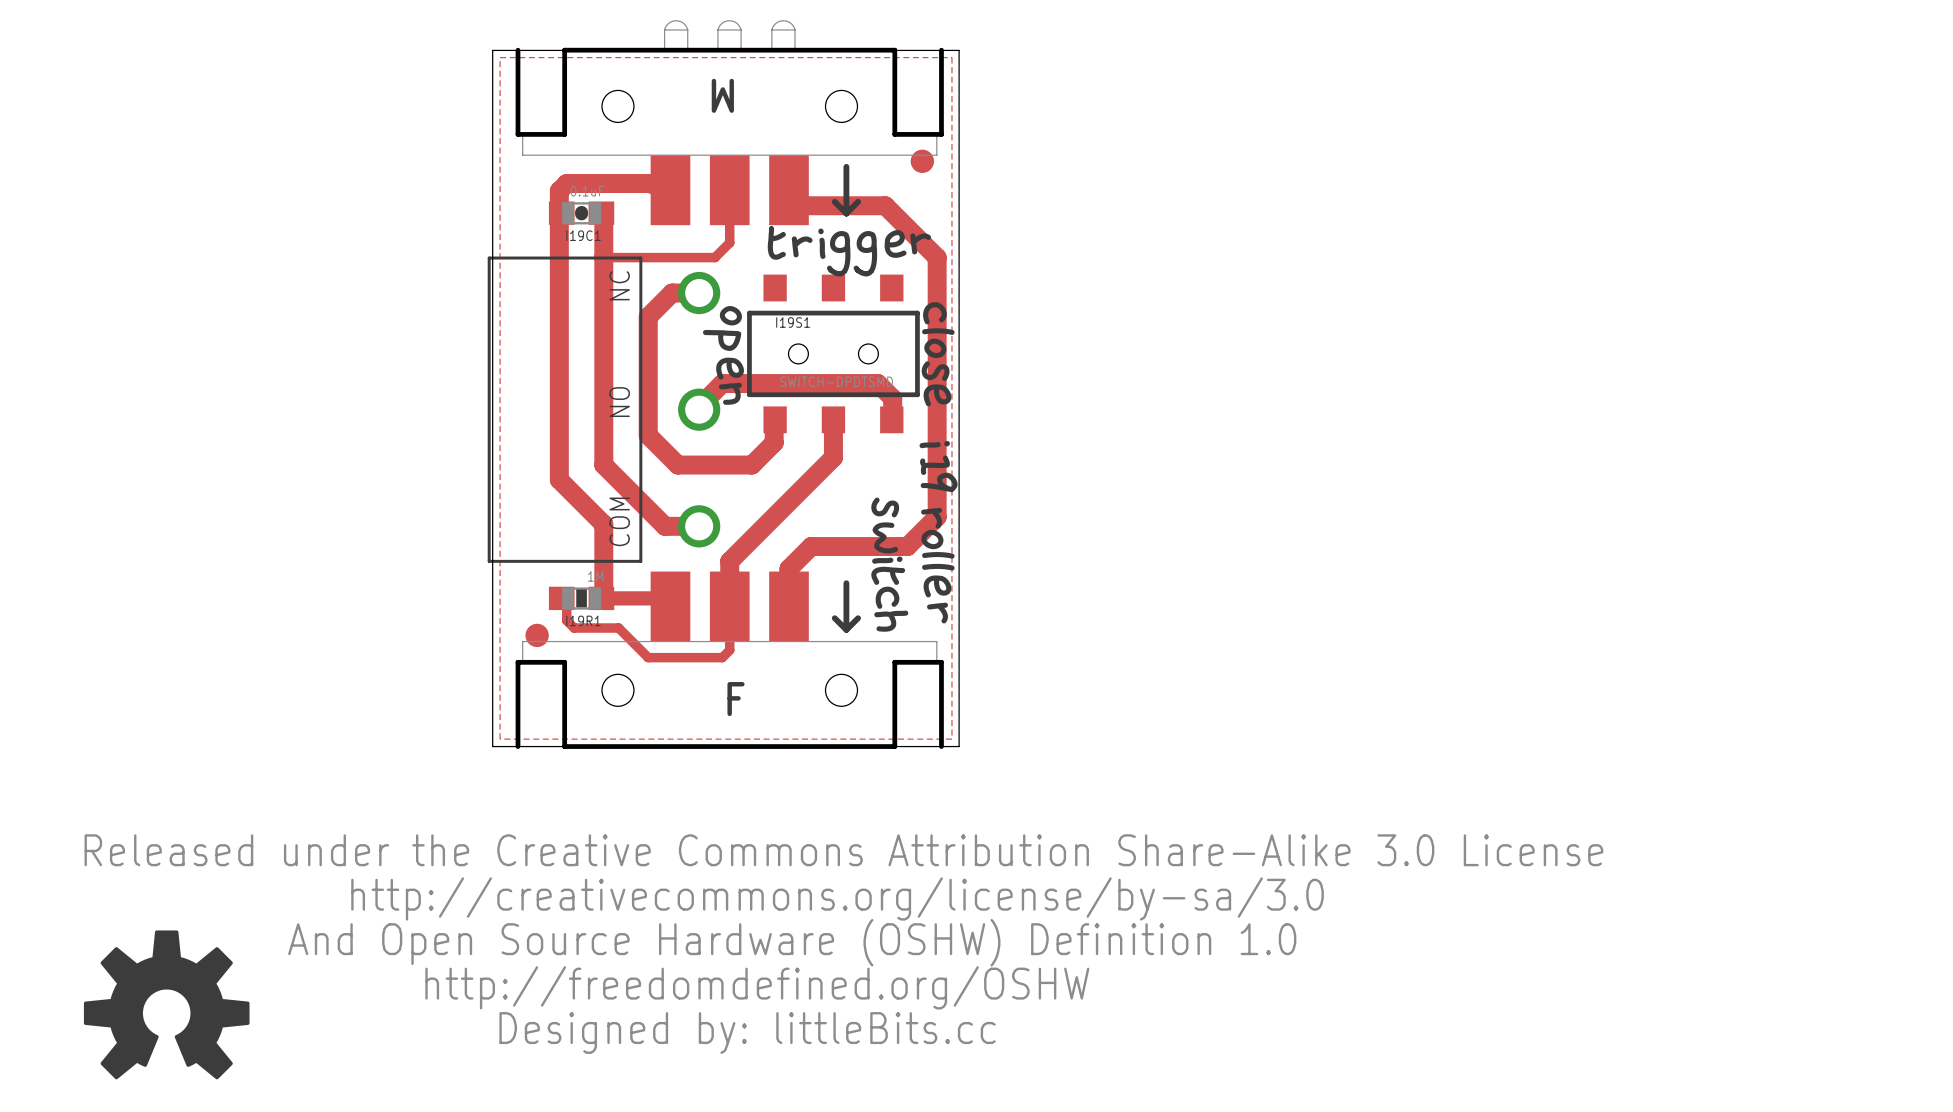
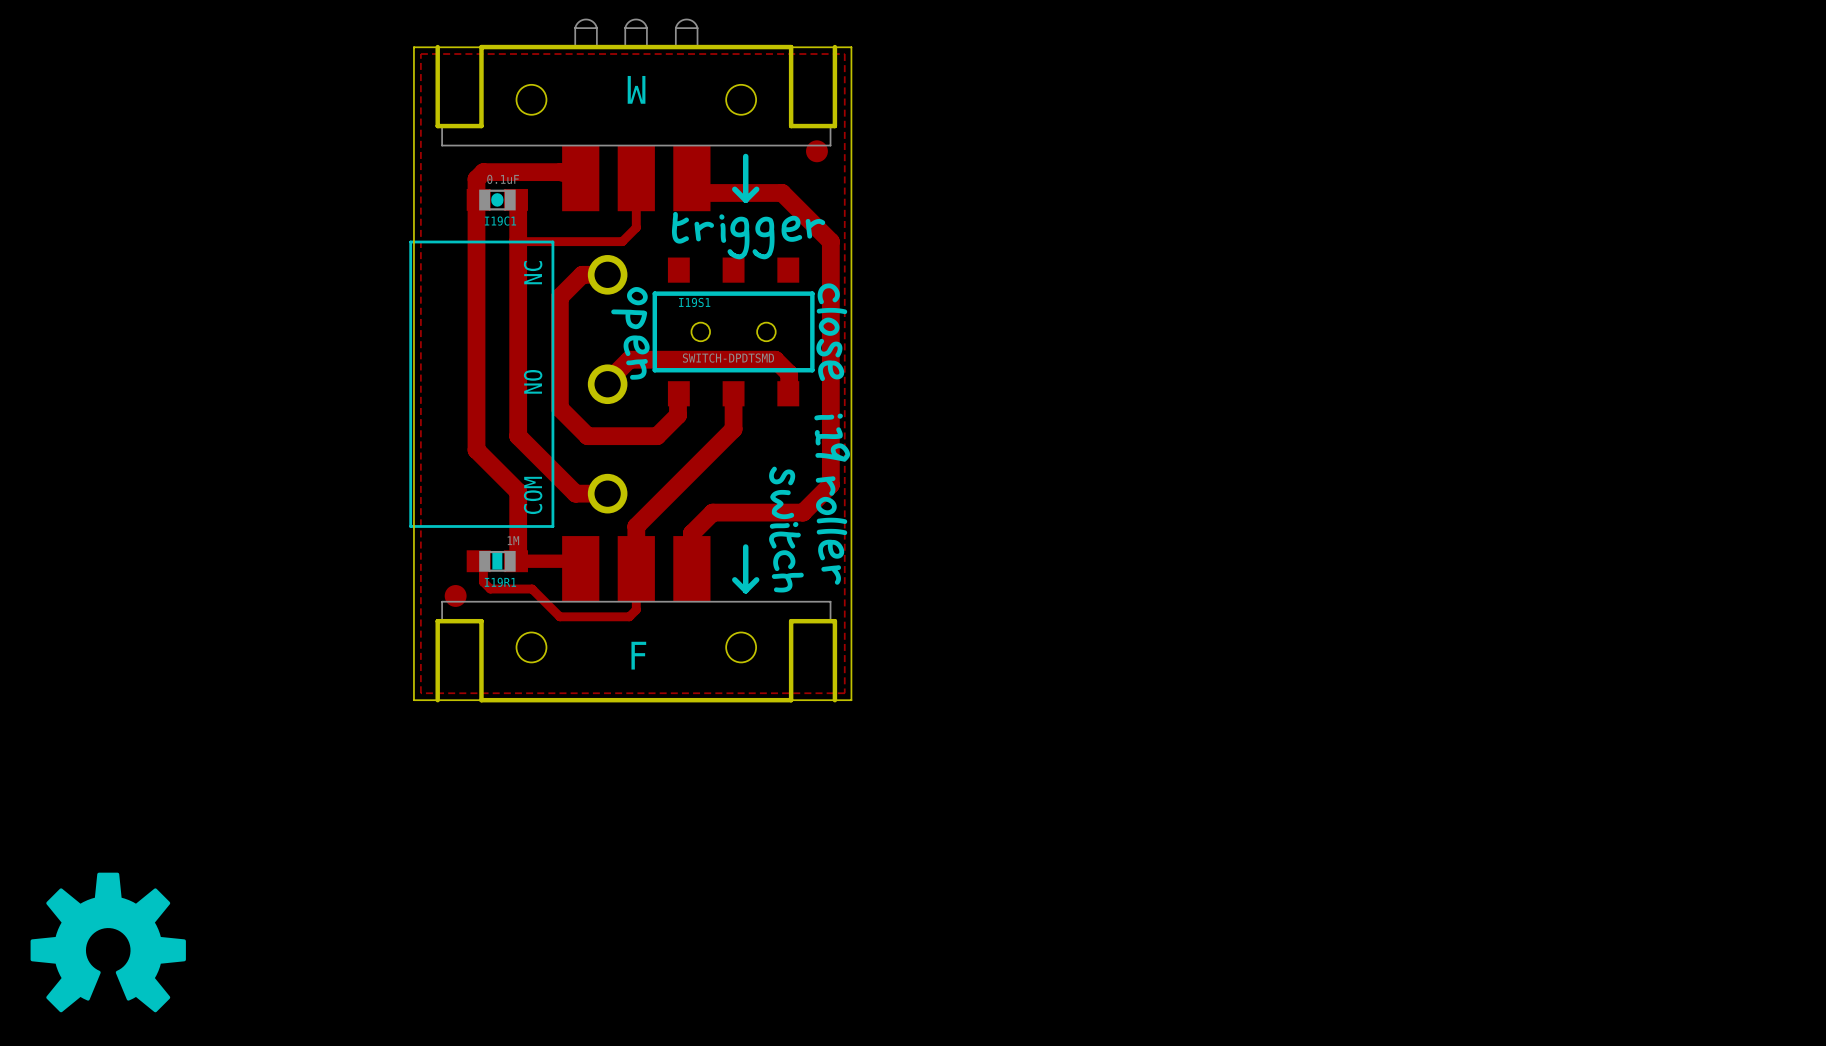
drawing: [84, 834, 1604, 1054] -> none

